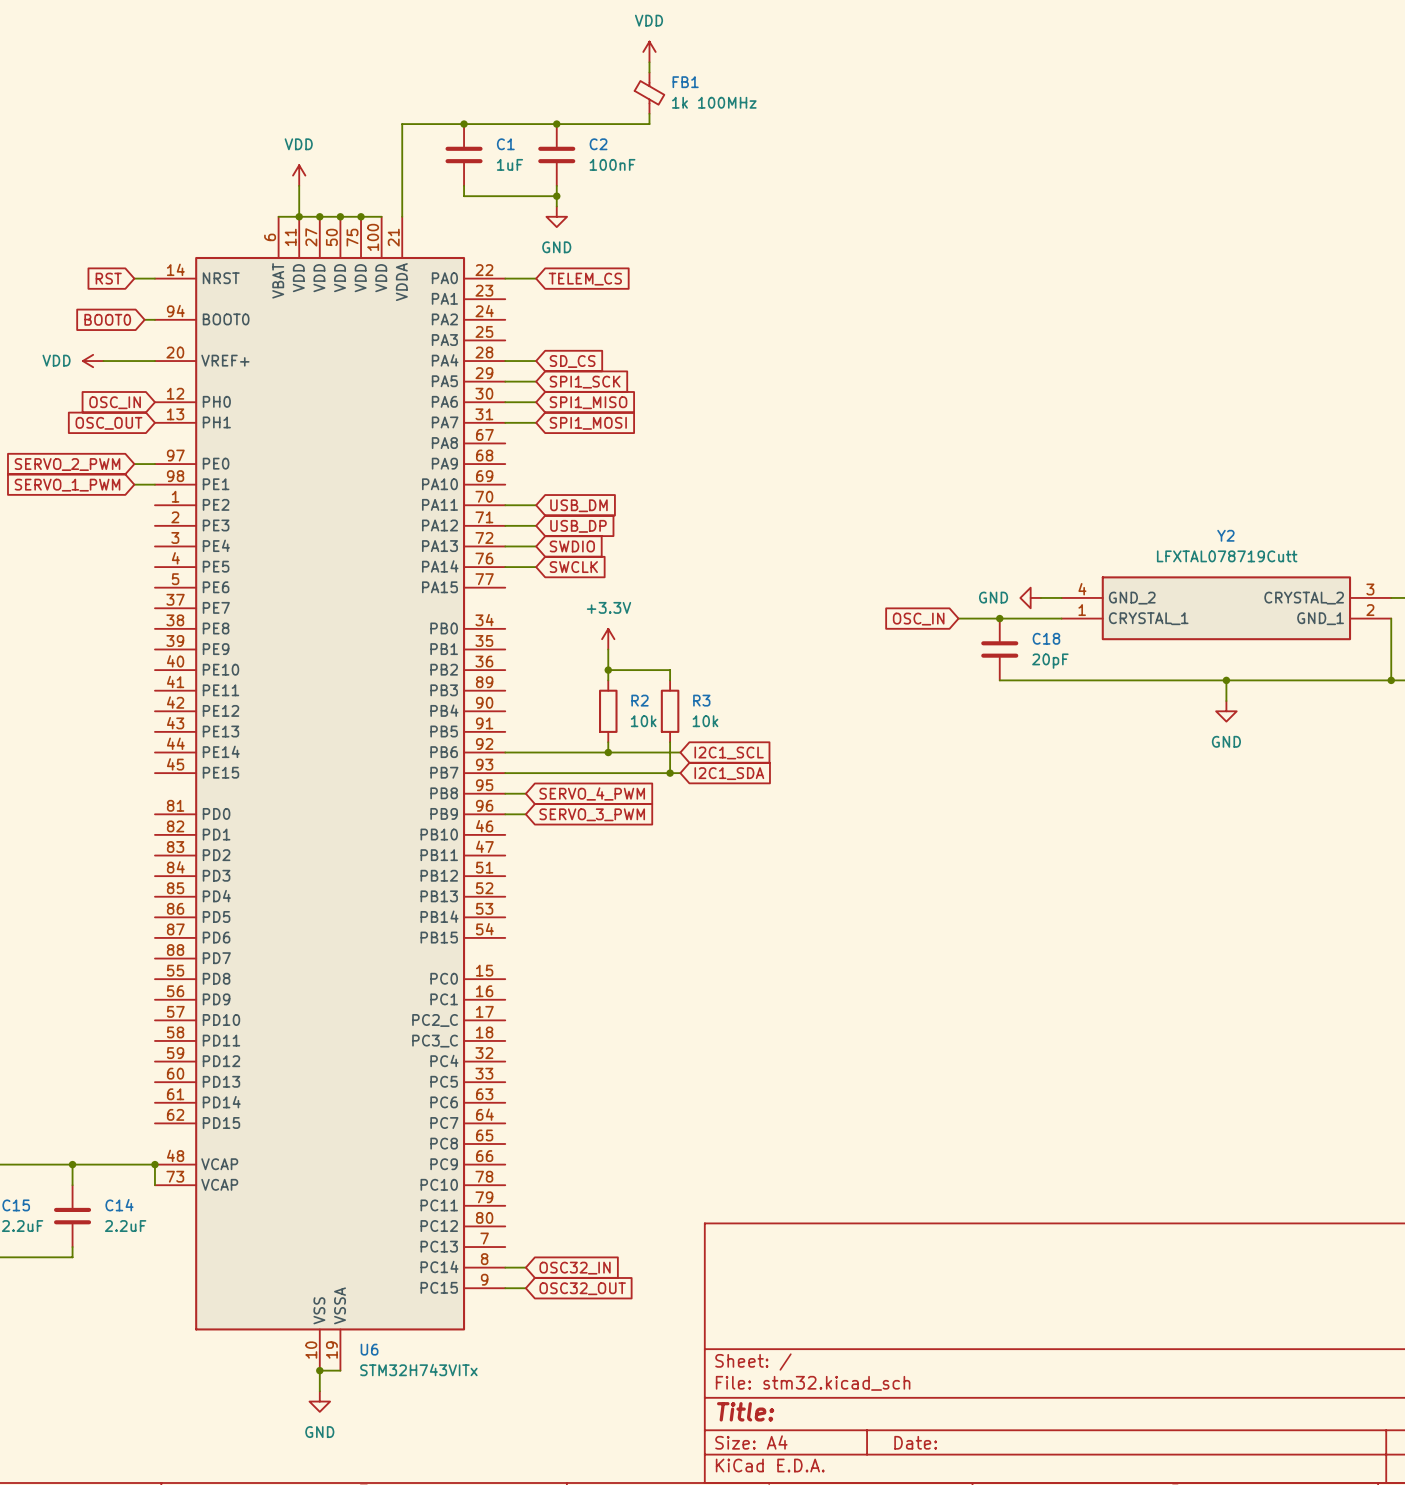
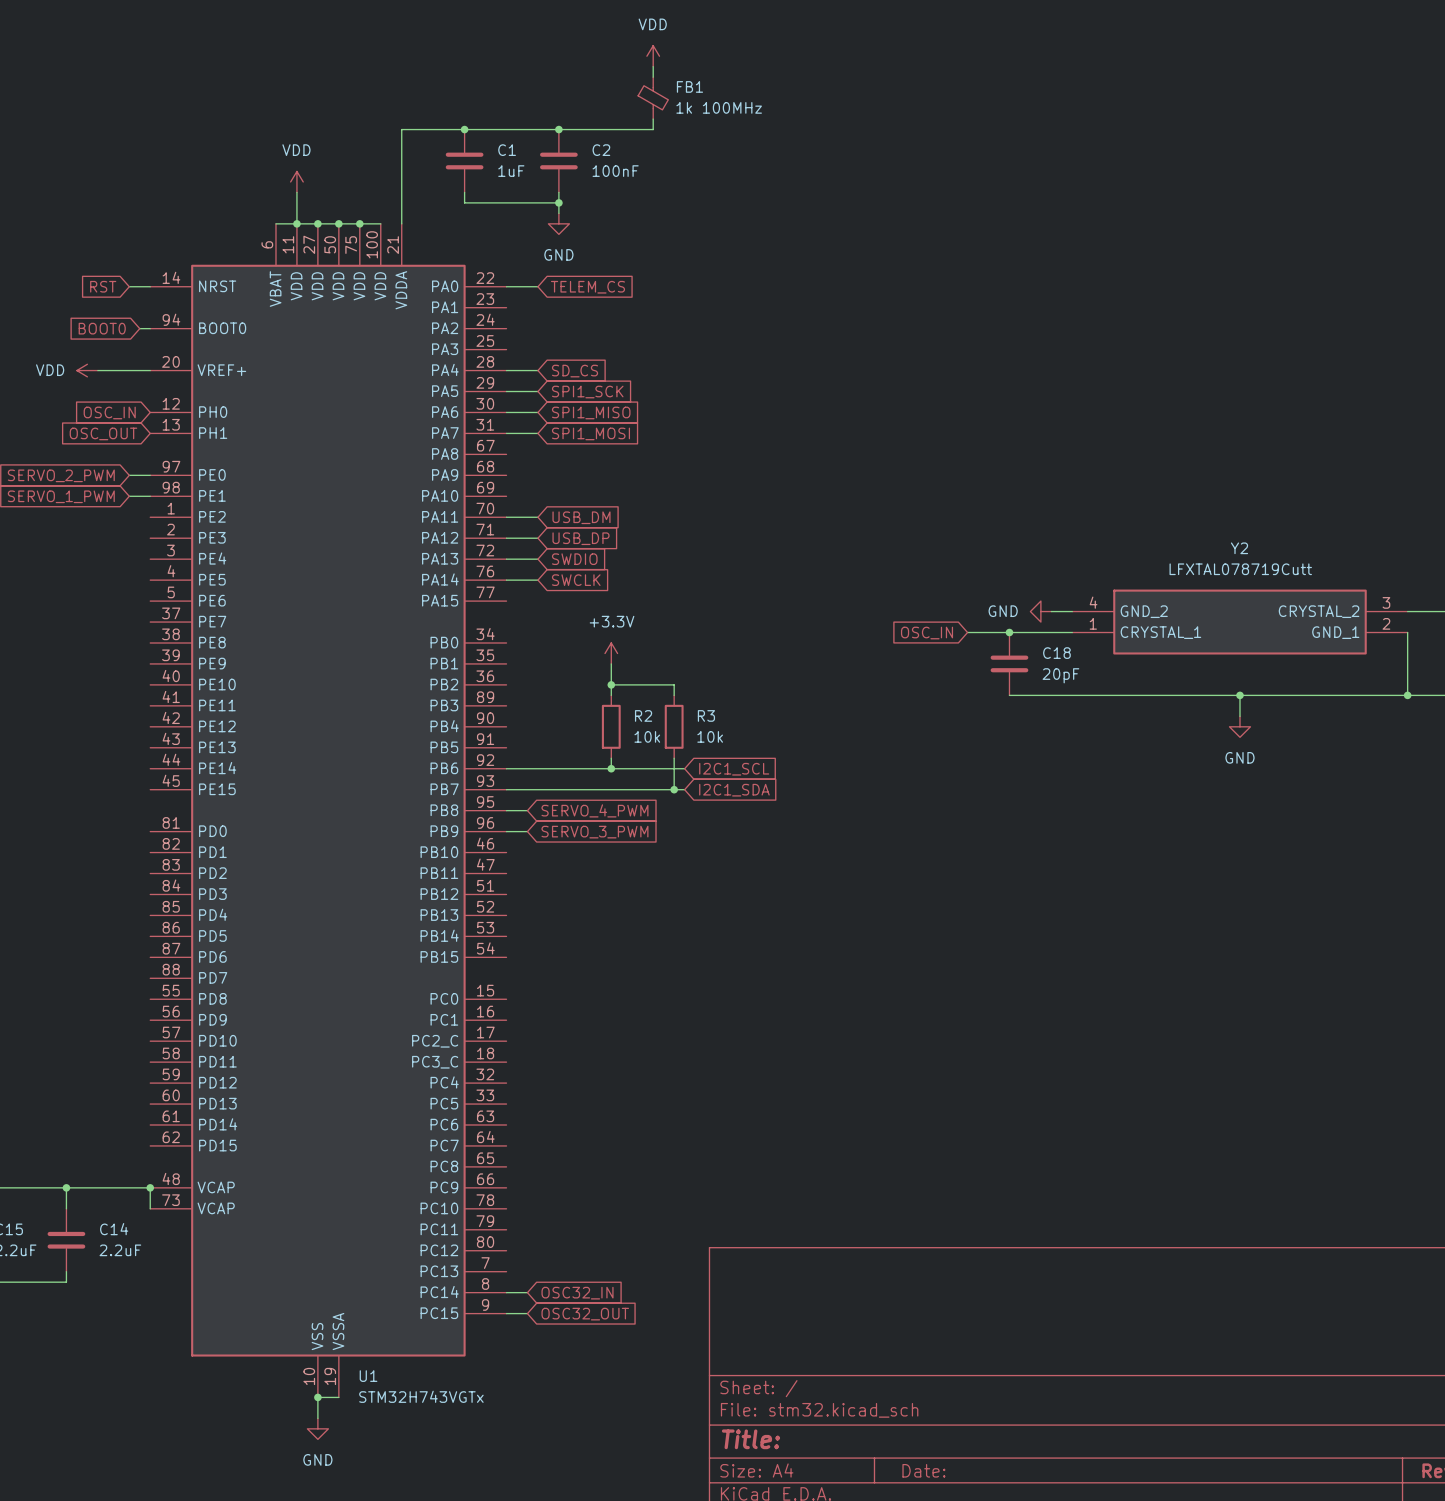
U6 name: U6 (369, 1349) -> U1 (368, 1376)
U6 value: STM32H743VITx (418, 1370) -> STM32H743VGTx (421, 1396)

